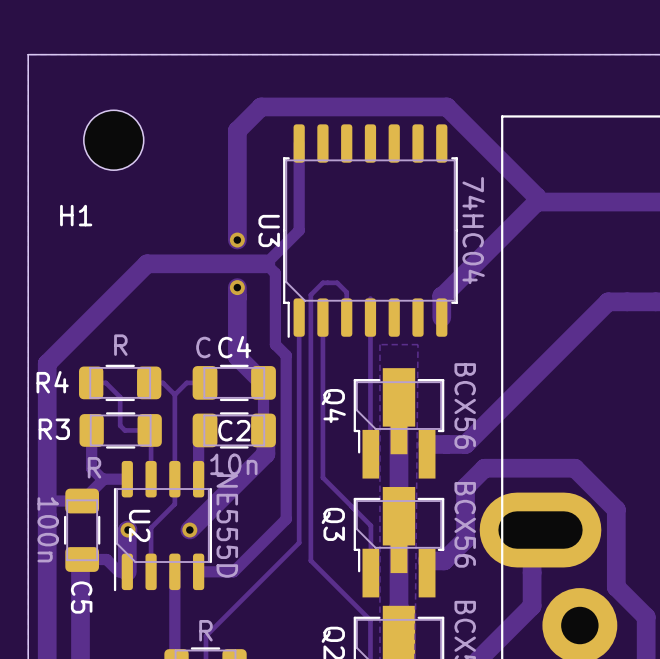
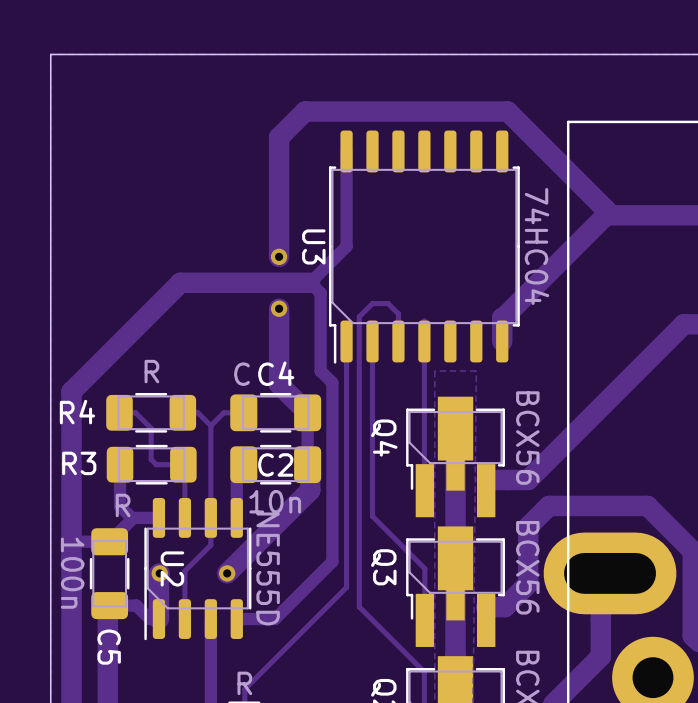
H1: (113, 140) -> none

